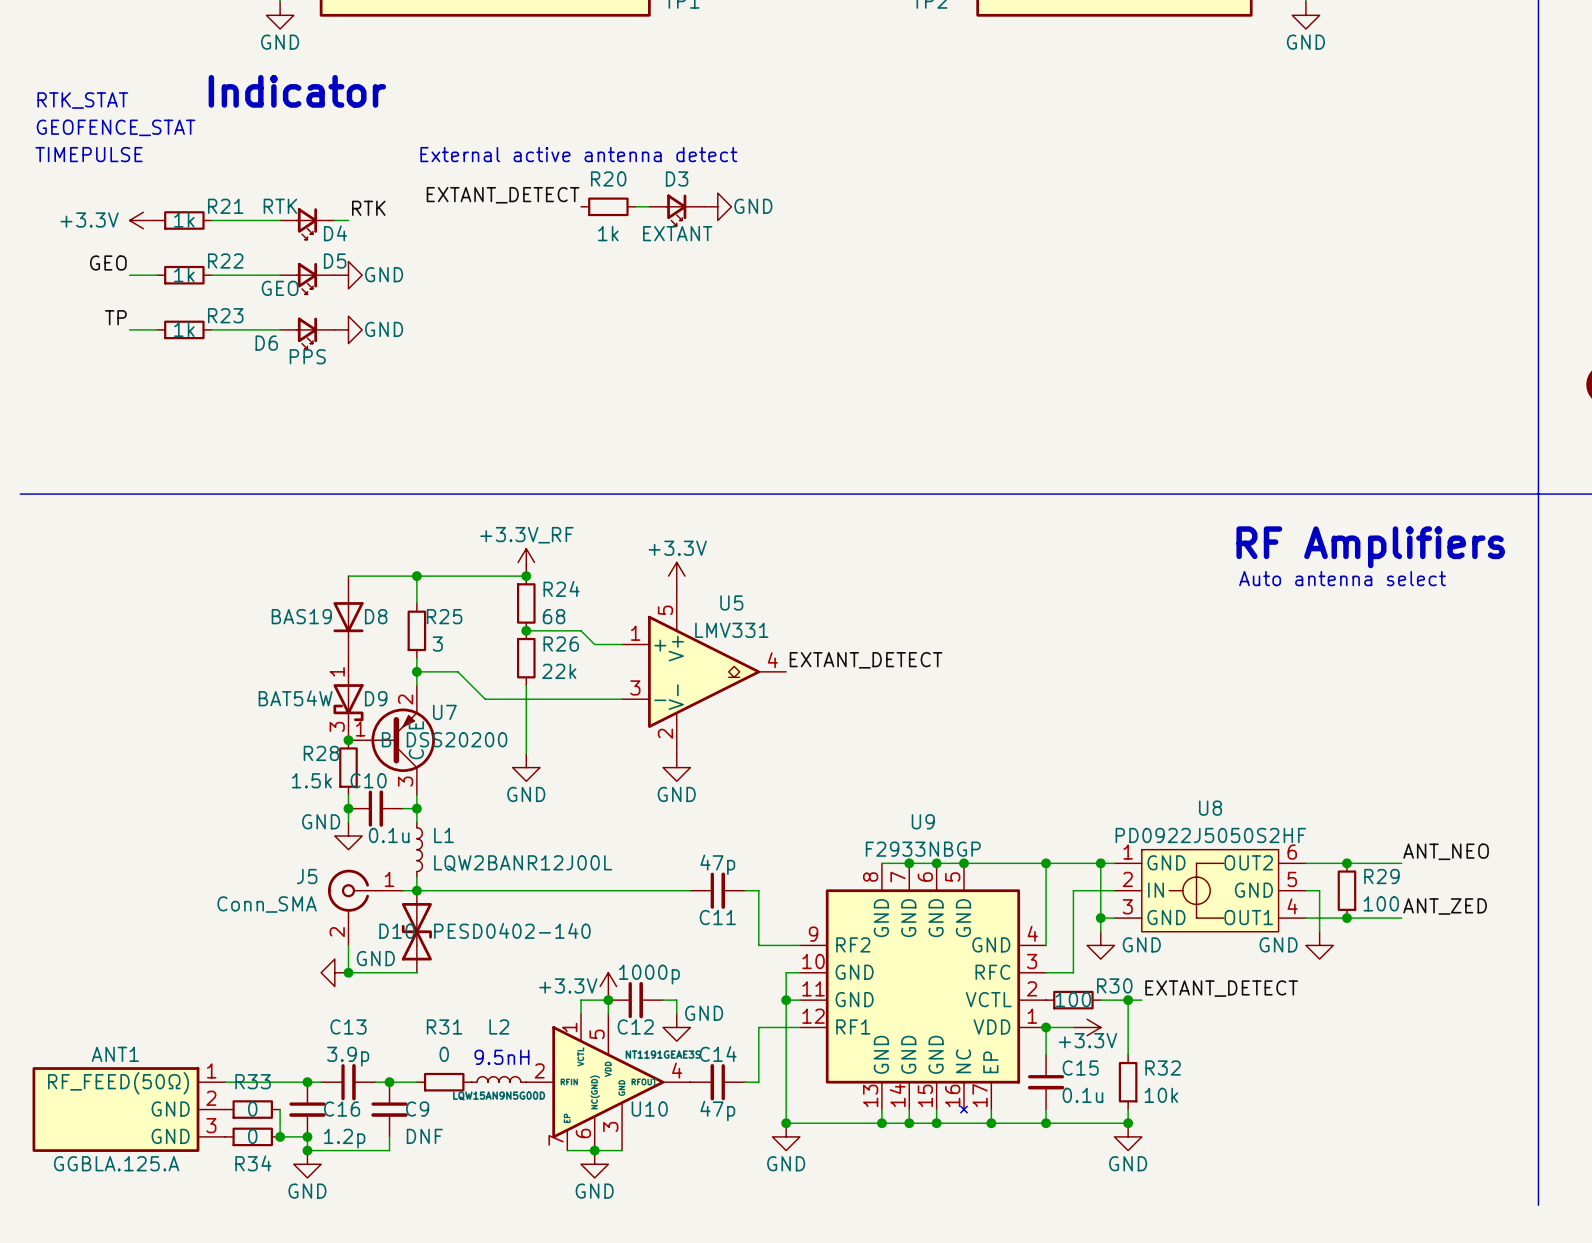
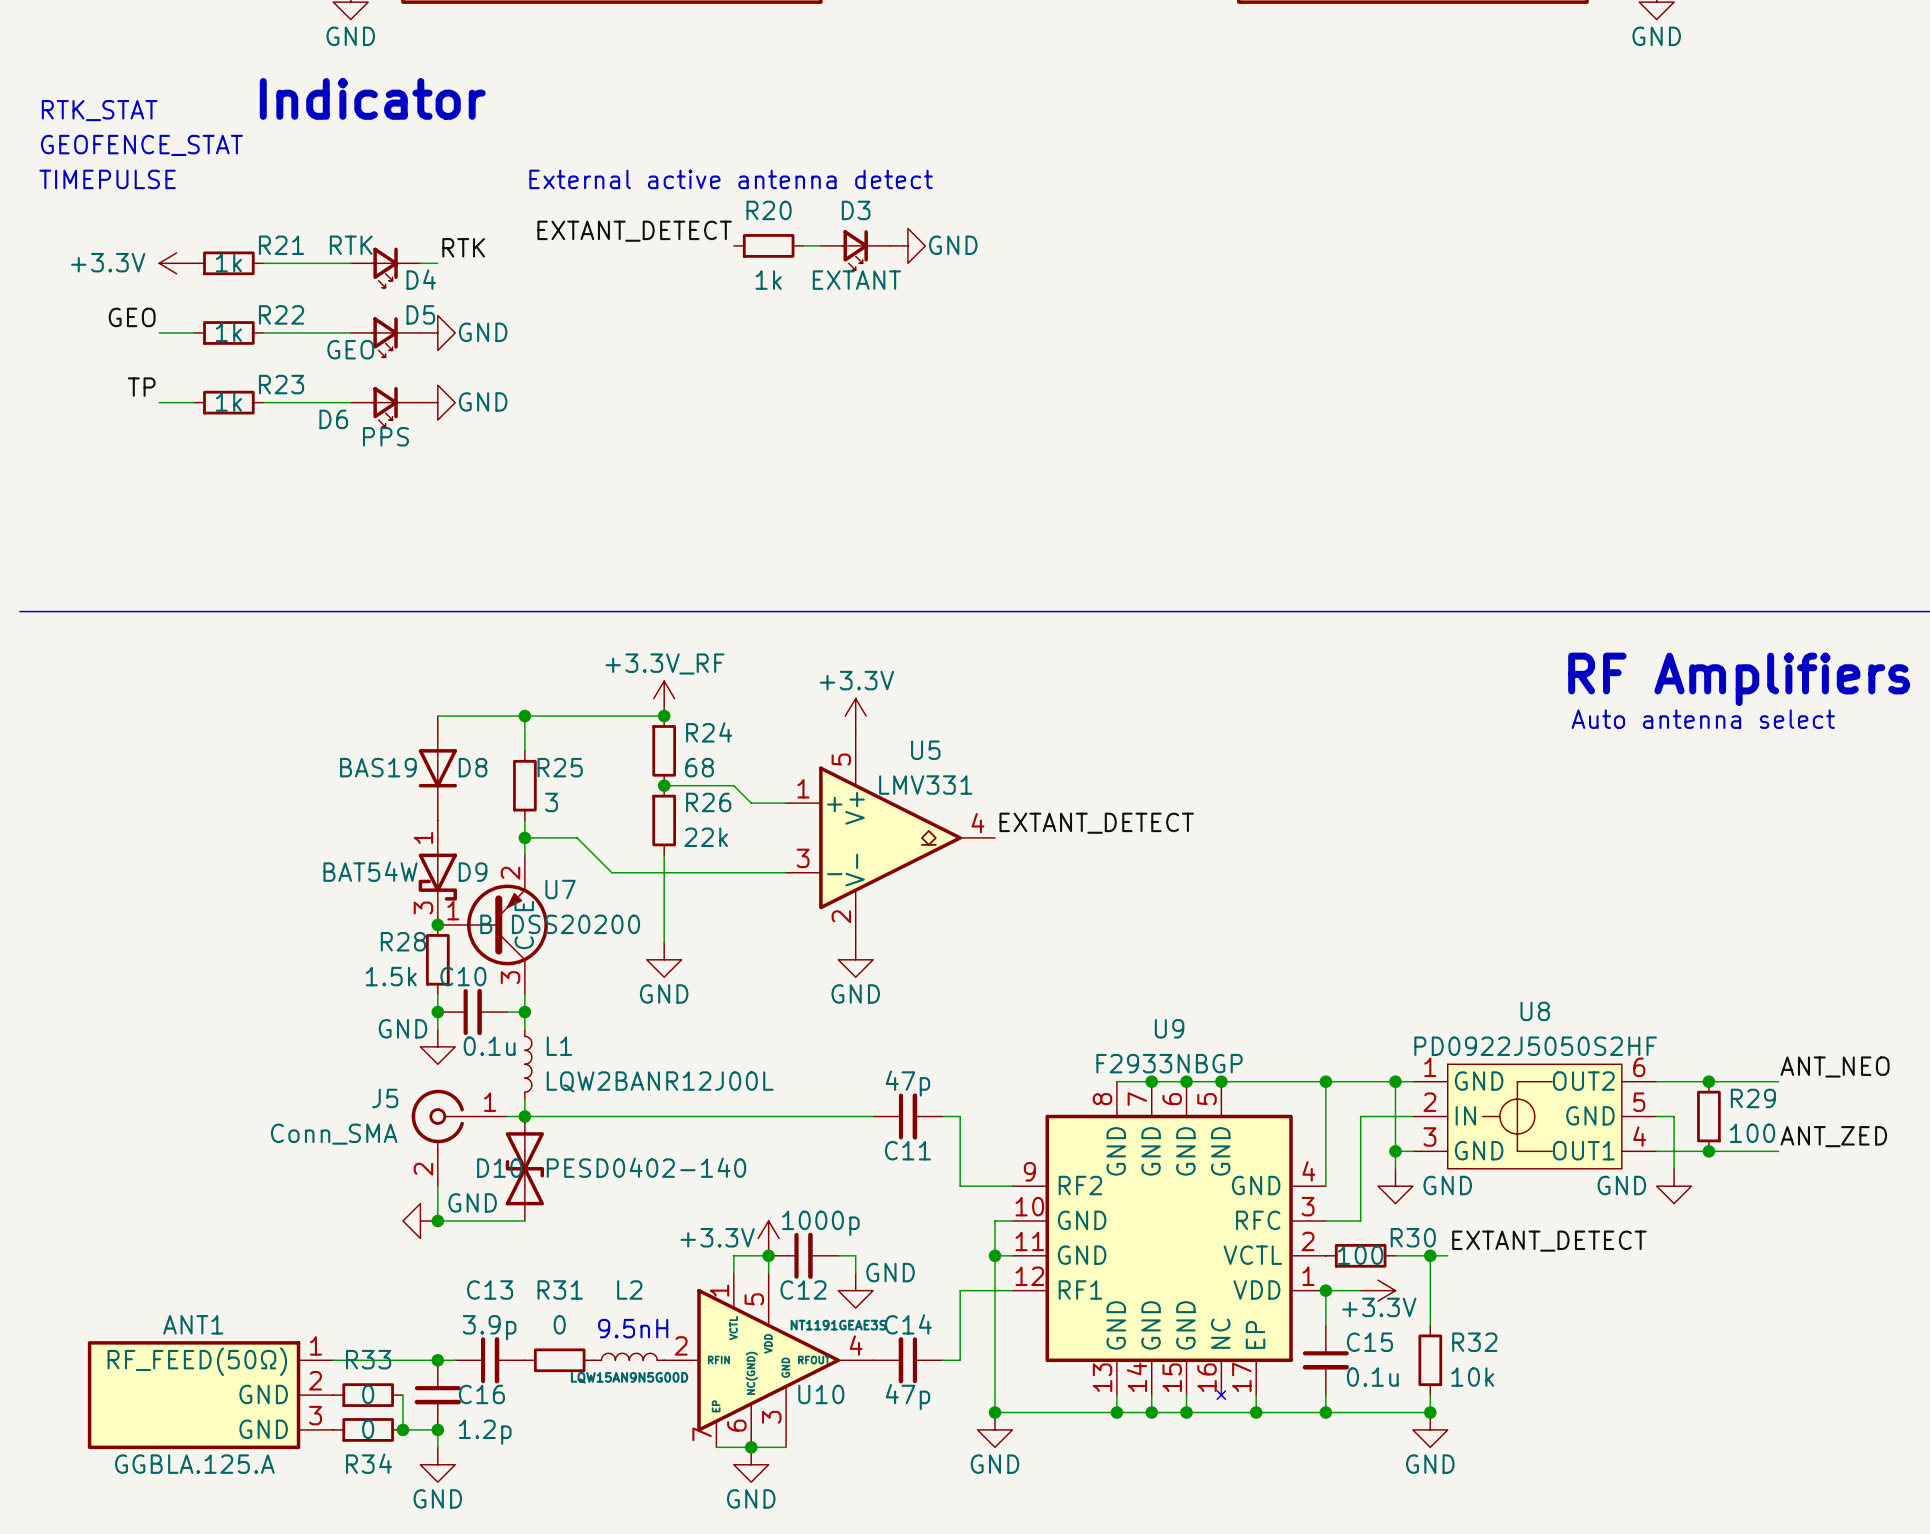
junction: (307, 1082) -> none
junction: none -> (437, 1360)
C13 position: (348, 1082) -> (490, 1360)
junction: (389, 1082) -> none
ANT1 position: (128, 1109) -> (210, 1395)
R33 position: (252, 1109) -> (368, 1395)
wire: (280, 1109) (280, 1136) (307, 1136) (307, 1150) (389, 1150) (389, 1136) -> none
C16 position: (307, 1109) -> (437, 1395)
wire: none -> (402, 1395) (402, 1429) (437, 1429) (437, 1447)
C9: DNF (389, 1109) -> none
R34 position: (252, 1136) -> (368, 1429)
junction: (280, 1136) -> none
junction: (307, 1136) -> none
junction: none -> (402, 1429)
junction: none -> (437, 1429)
junction: (307, 1150) -> none
power symbol position: GND (307, 1164) -> GND (437, 1464)

